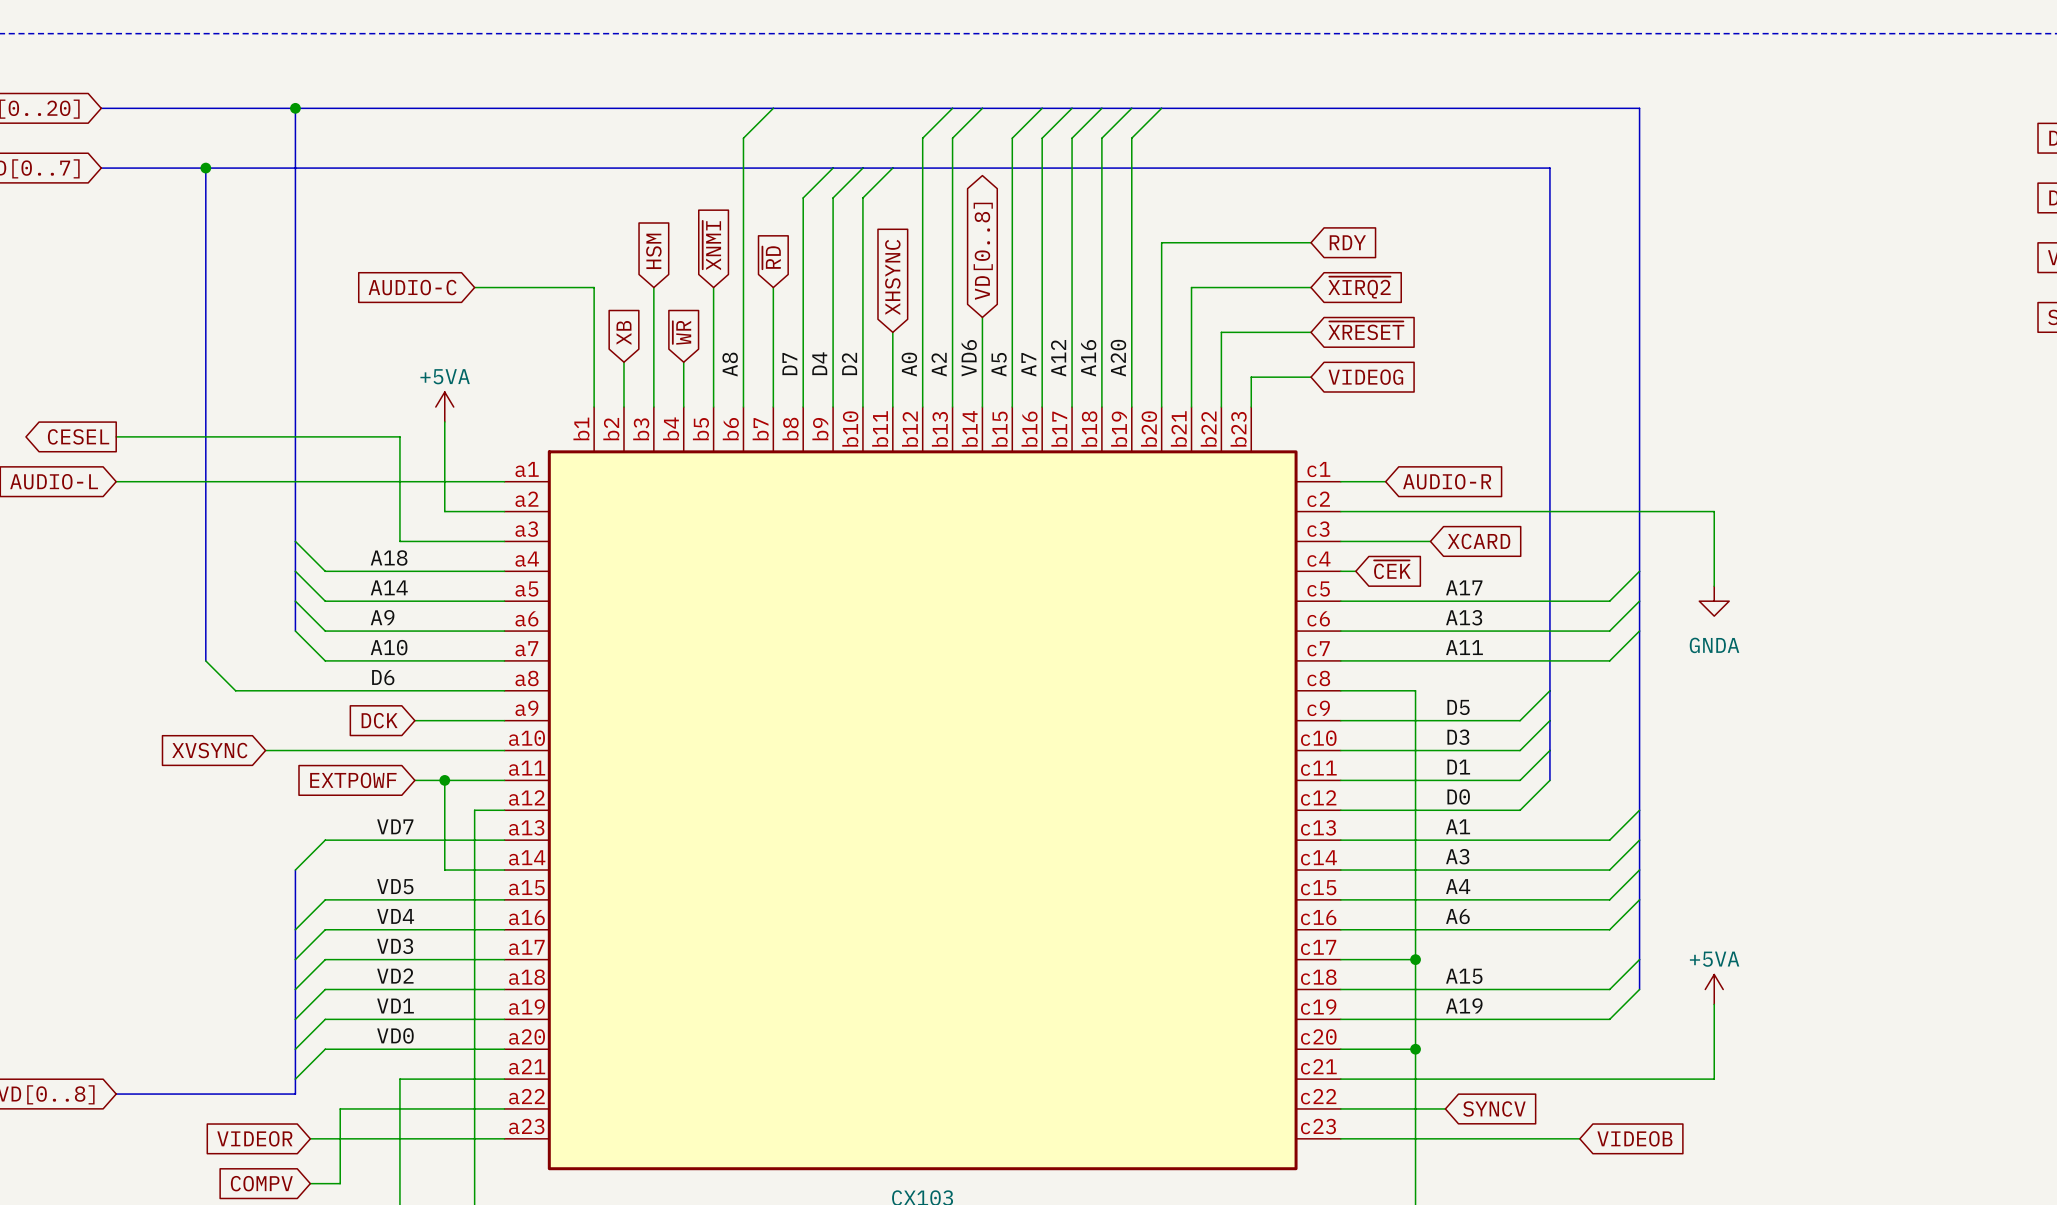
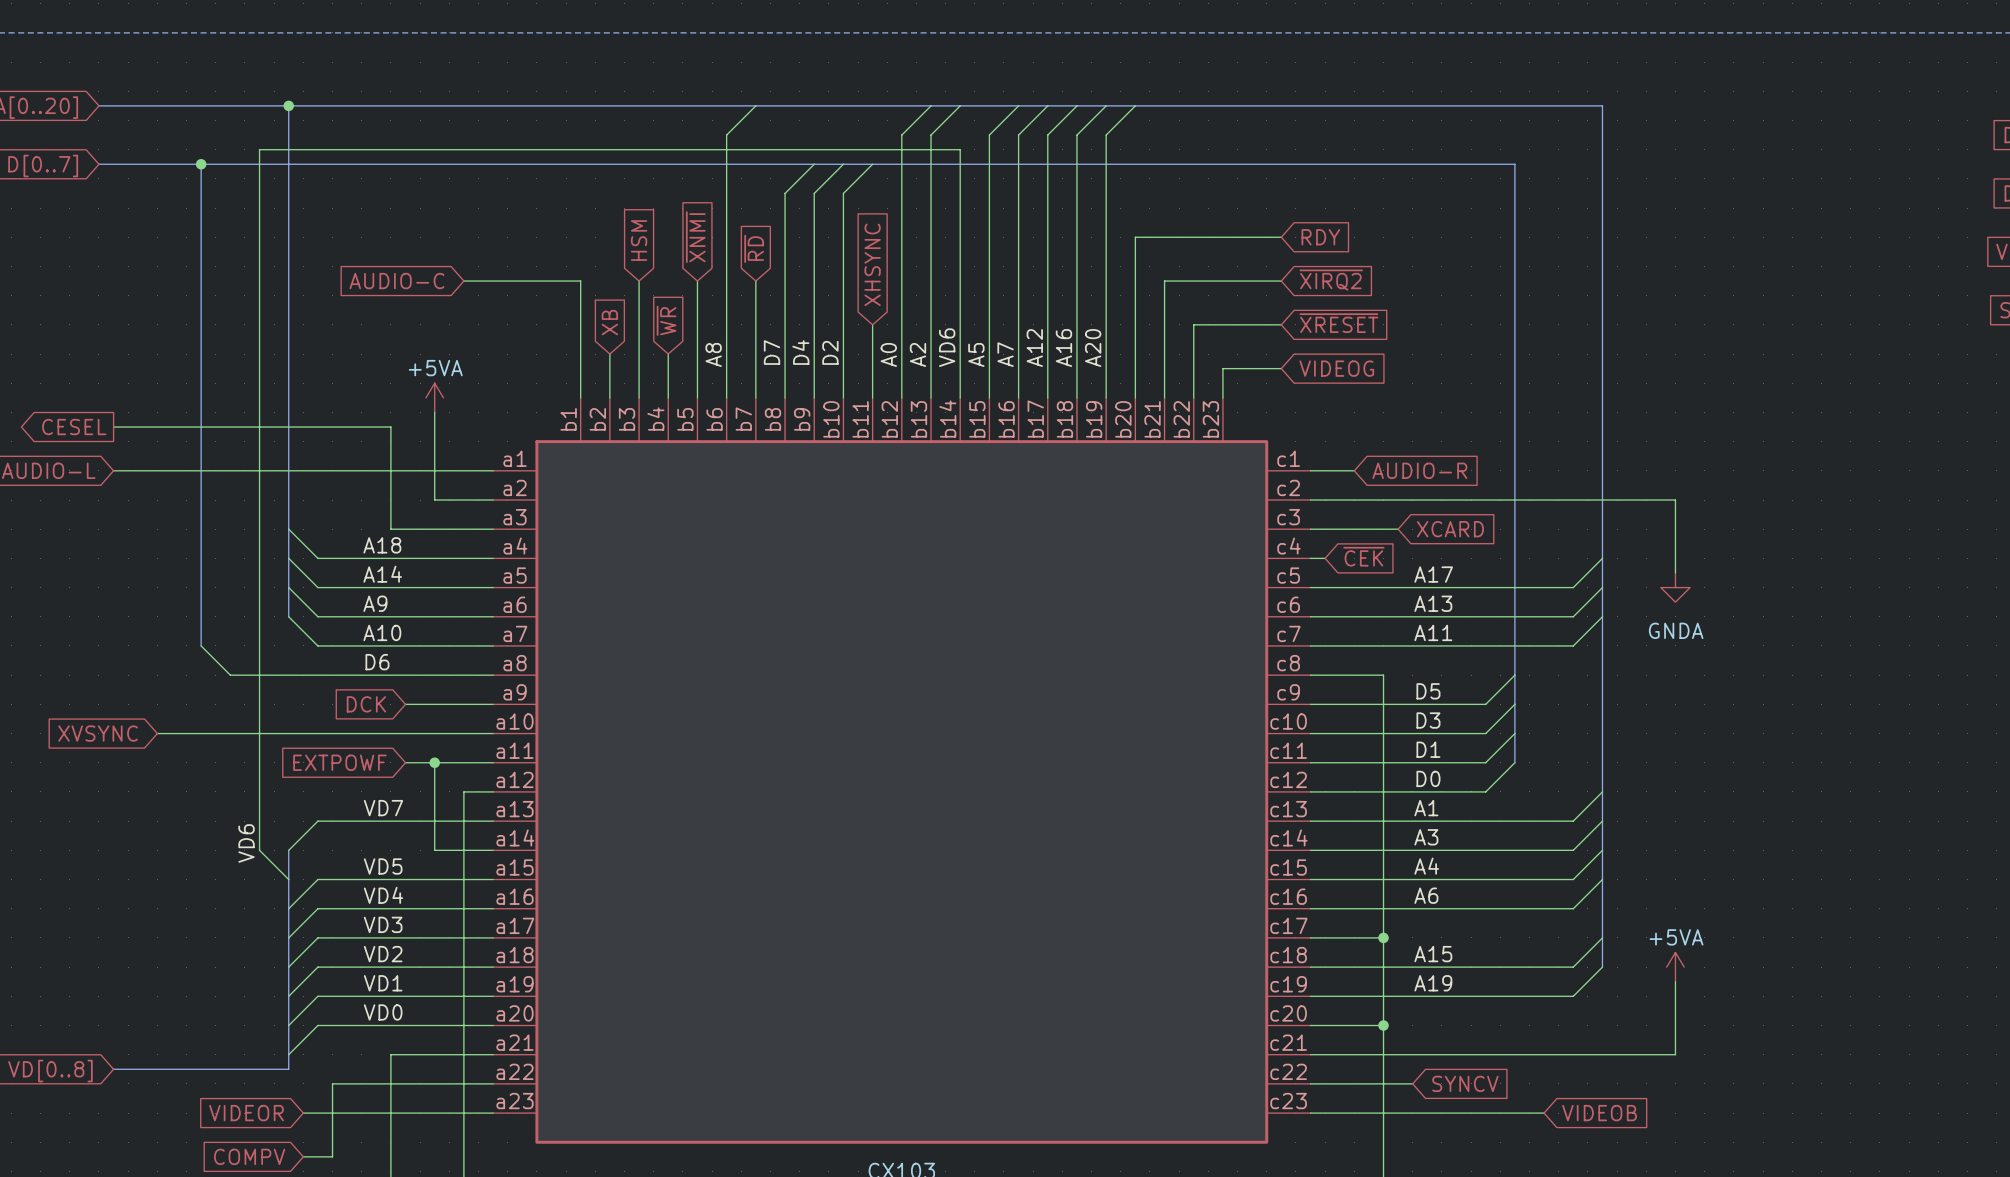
global label: VD[0..8] (983, 251) -> none
wire: none -> (960, 310) (960, 149) (259, 149) (259, 850) (288, 879)
wire: none -> (157, 733) (259, 733)
global label position: XVSYNC (209, 750) -> XVSYNC (98, 733)
label: none -> VD6 (246, 843)

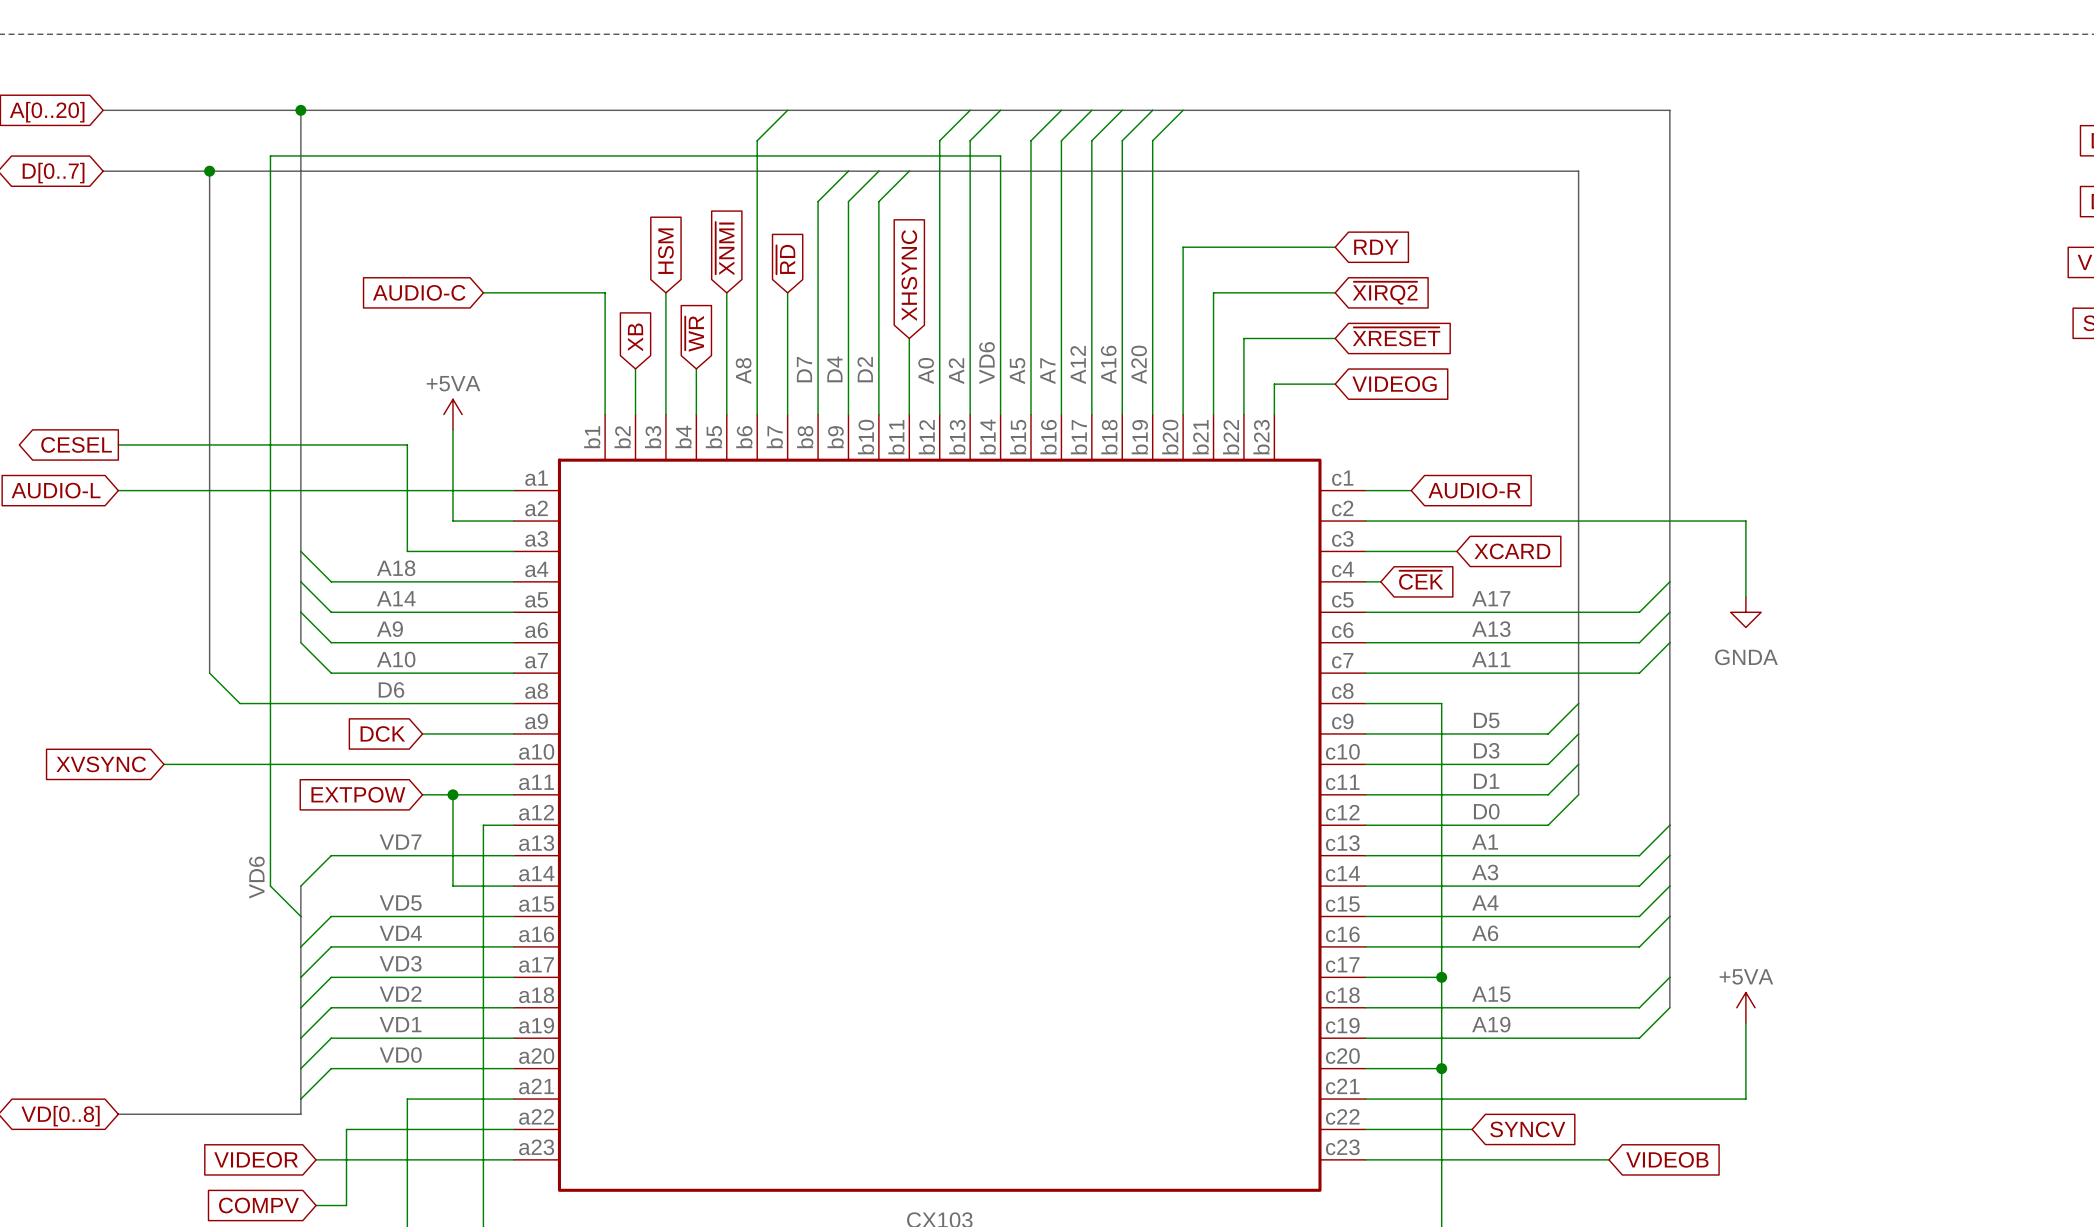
global label: EXTPOWF (339, 762) -> EXTPOW (358, 794)

